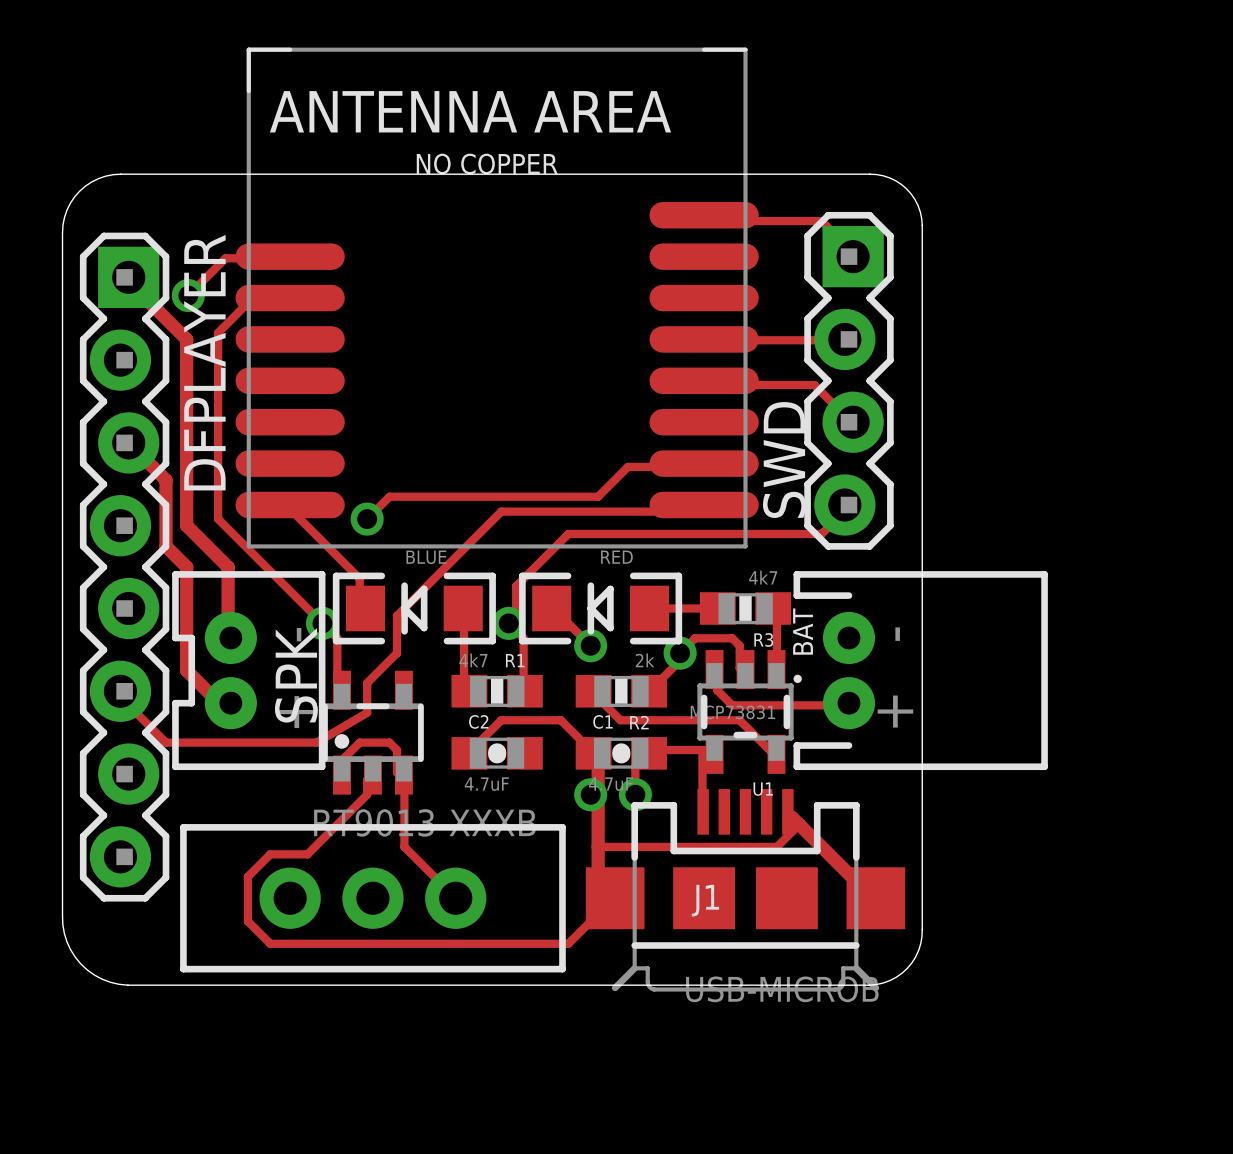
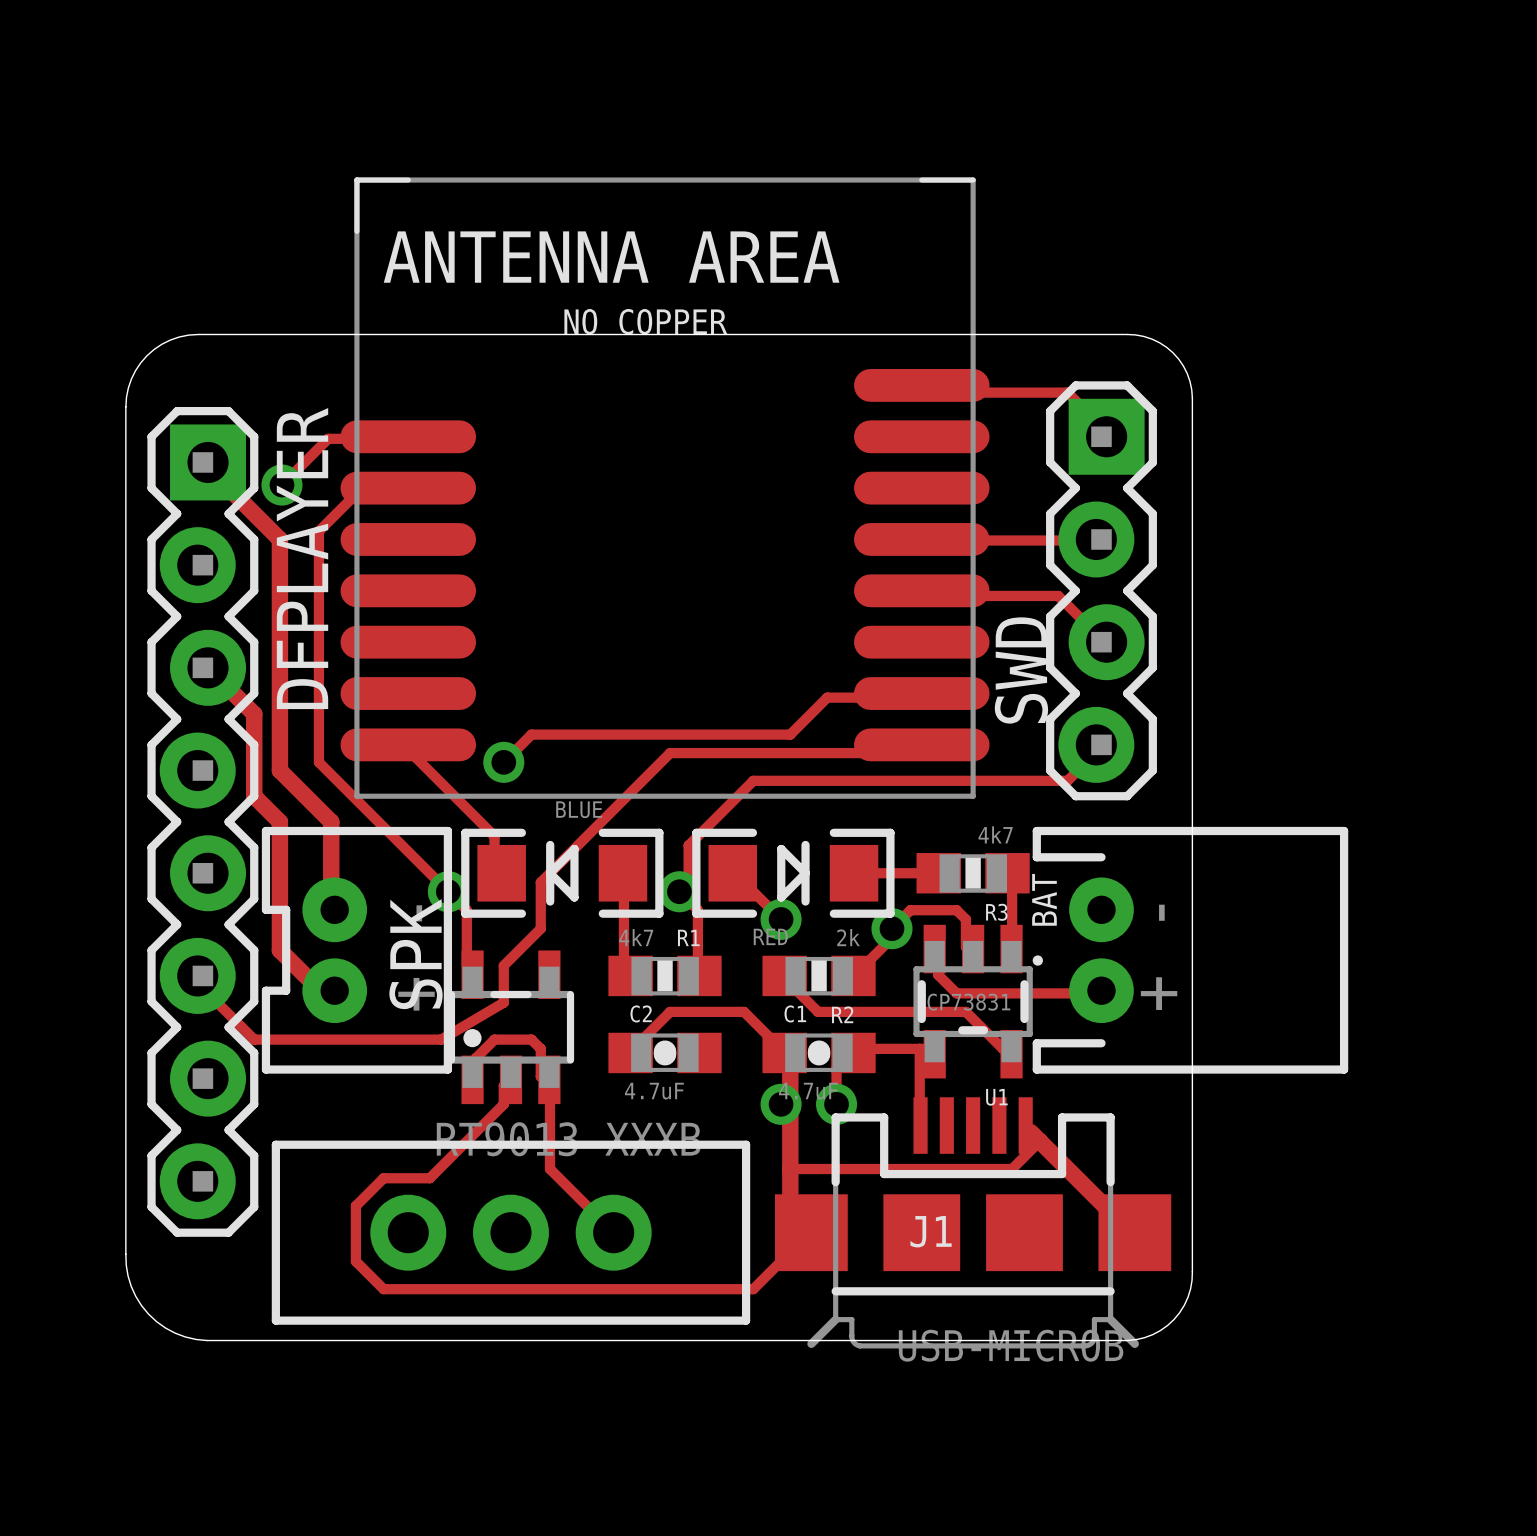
part rotation: 0° (600, 608) -> 180° (793, 873)

